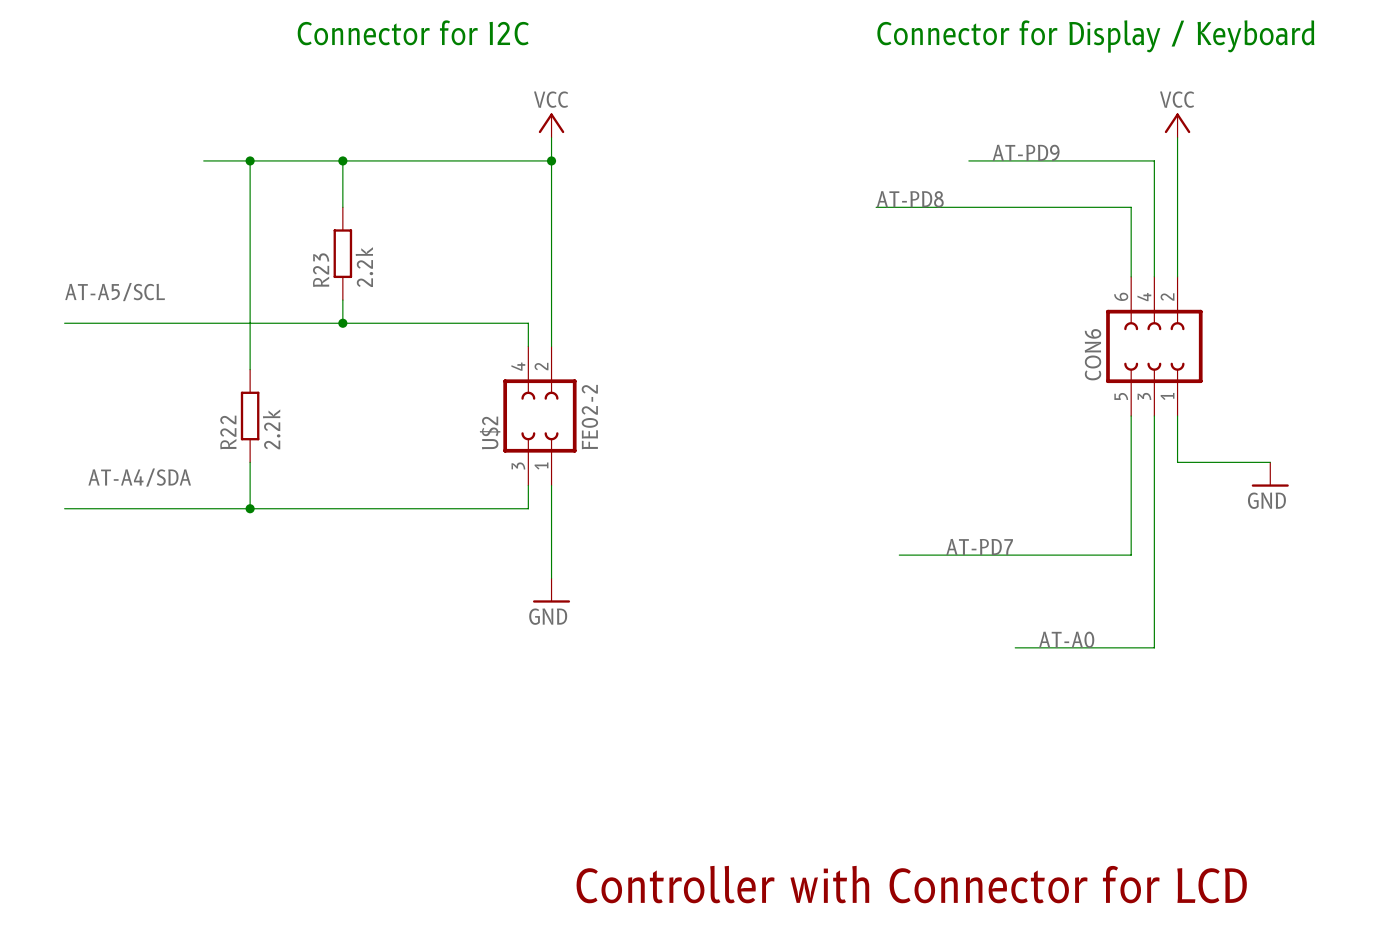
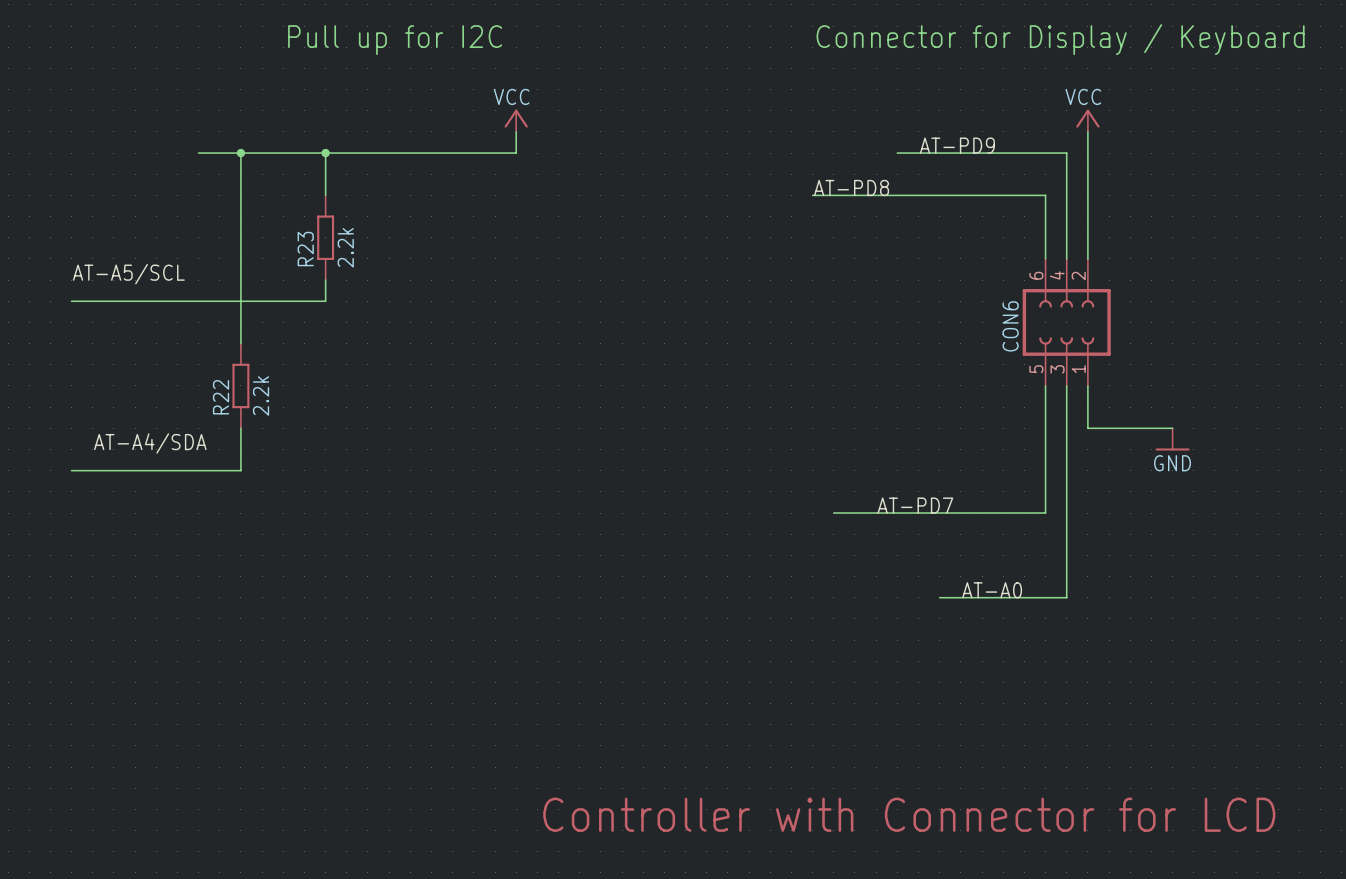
text: Connector for I2C (413, 32) -> Pull up for I2C (395, 40)
wire: (551, 160) (551, 346) -> none
junction: (551, 160) -> none
wire: (342, 323) (528, 323) (528, 346) -> none
junction: (342, 323) -> none
U$2: FE02-2 (539, 415) -> none
wire: (528, 485) (528, 508) (250, 508) -> none
wire: (551, 485) (551, 578) -> none
junction: (250, 508) -> none
power symbol: GND (551, 590) -> none

